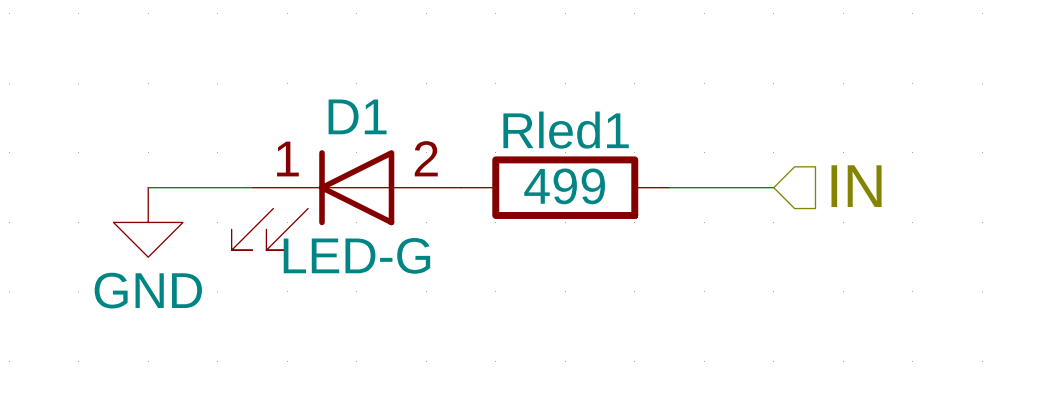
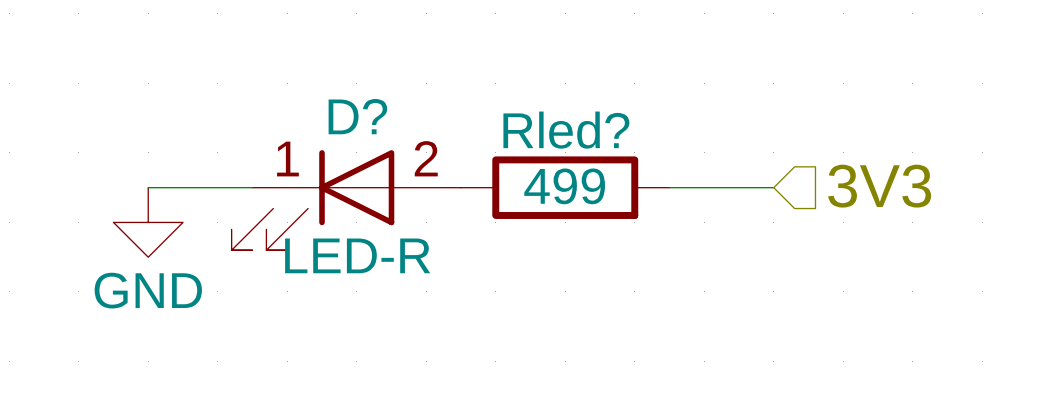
D1 name: D1 (357, 116) -> D? (357, 116)
Rled1 name: Rled1 (566, 130) -> Rled? (566, 130)
hierarchical label: IN (856, 186) -> 3V3 (879, 186)
D1 value: LED-G (356, 255) -> LED-R (357, 255)

